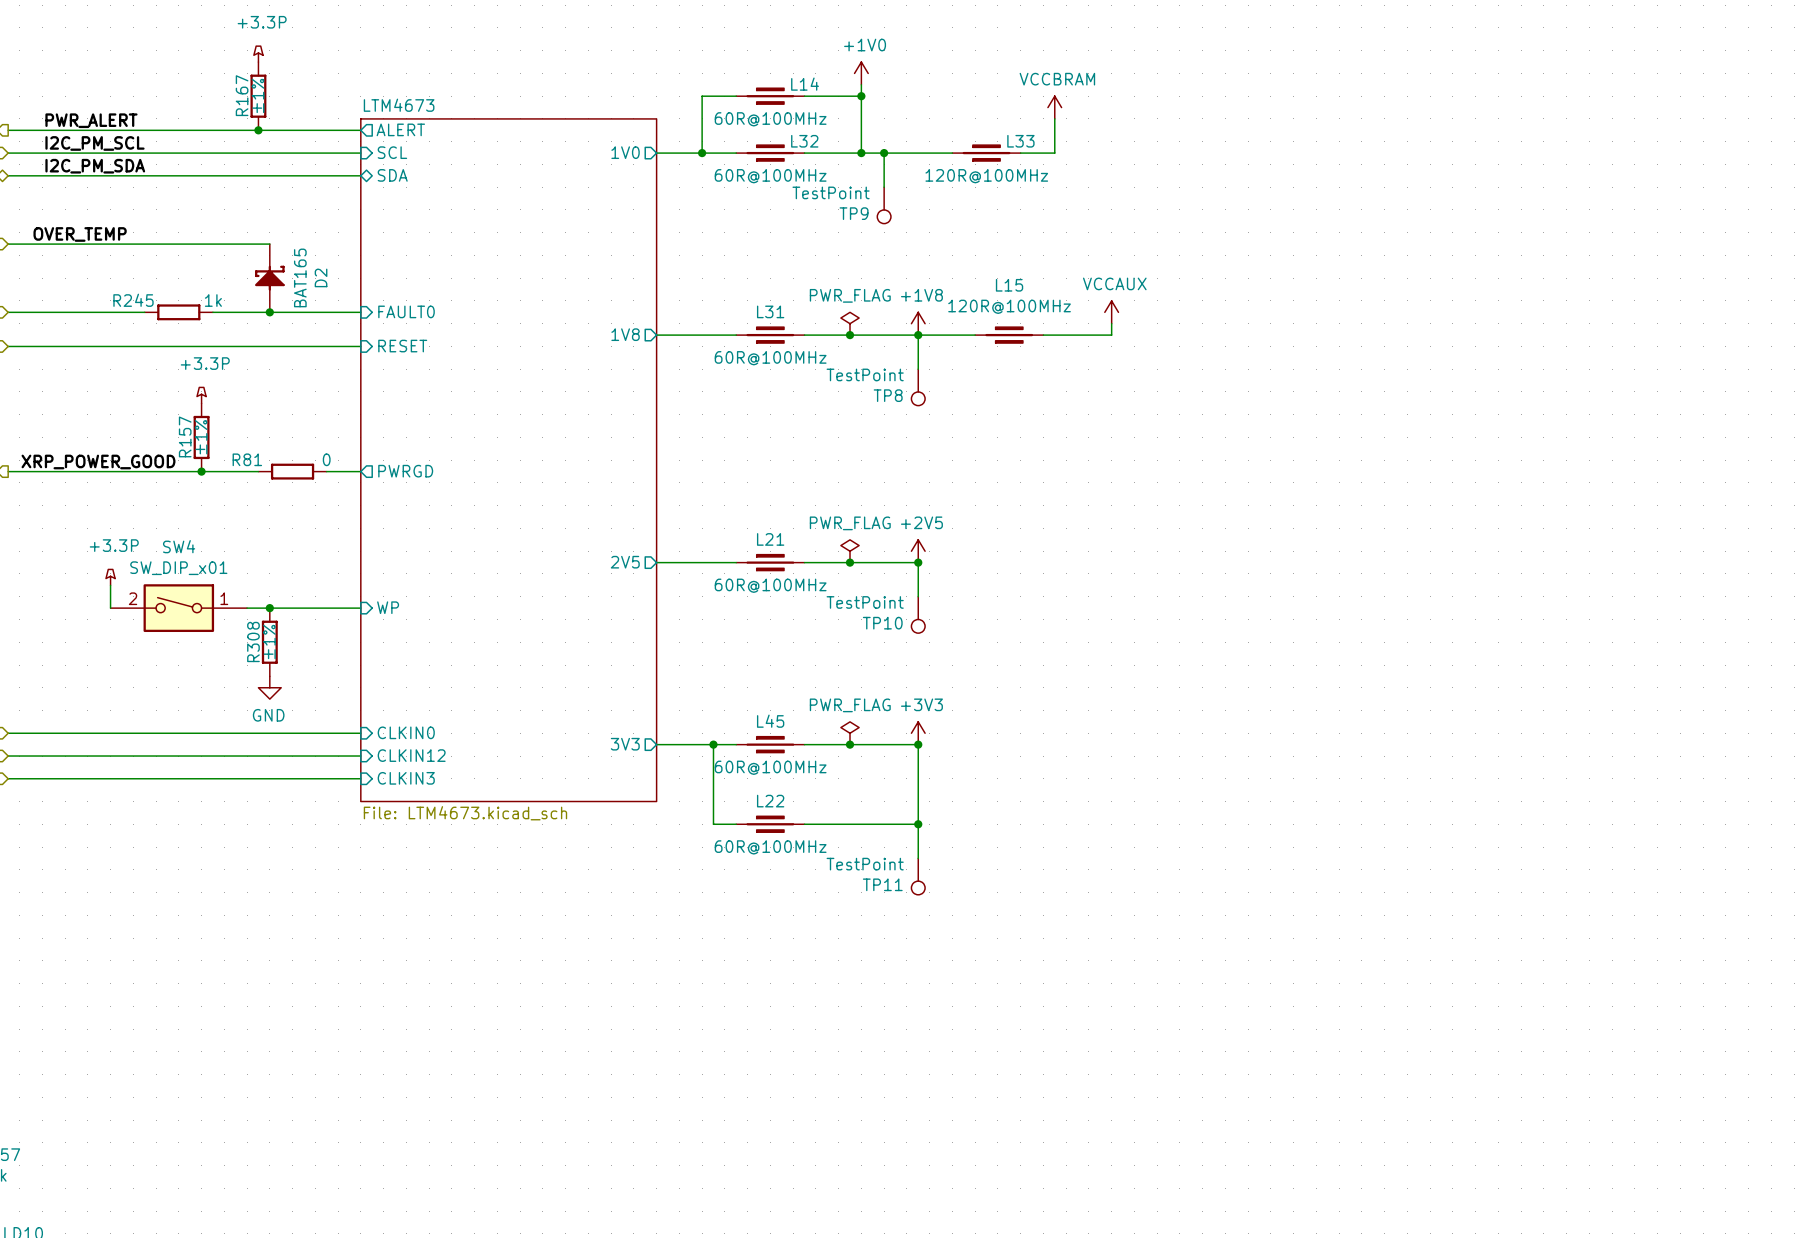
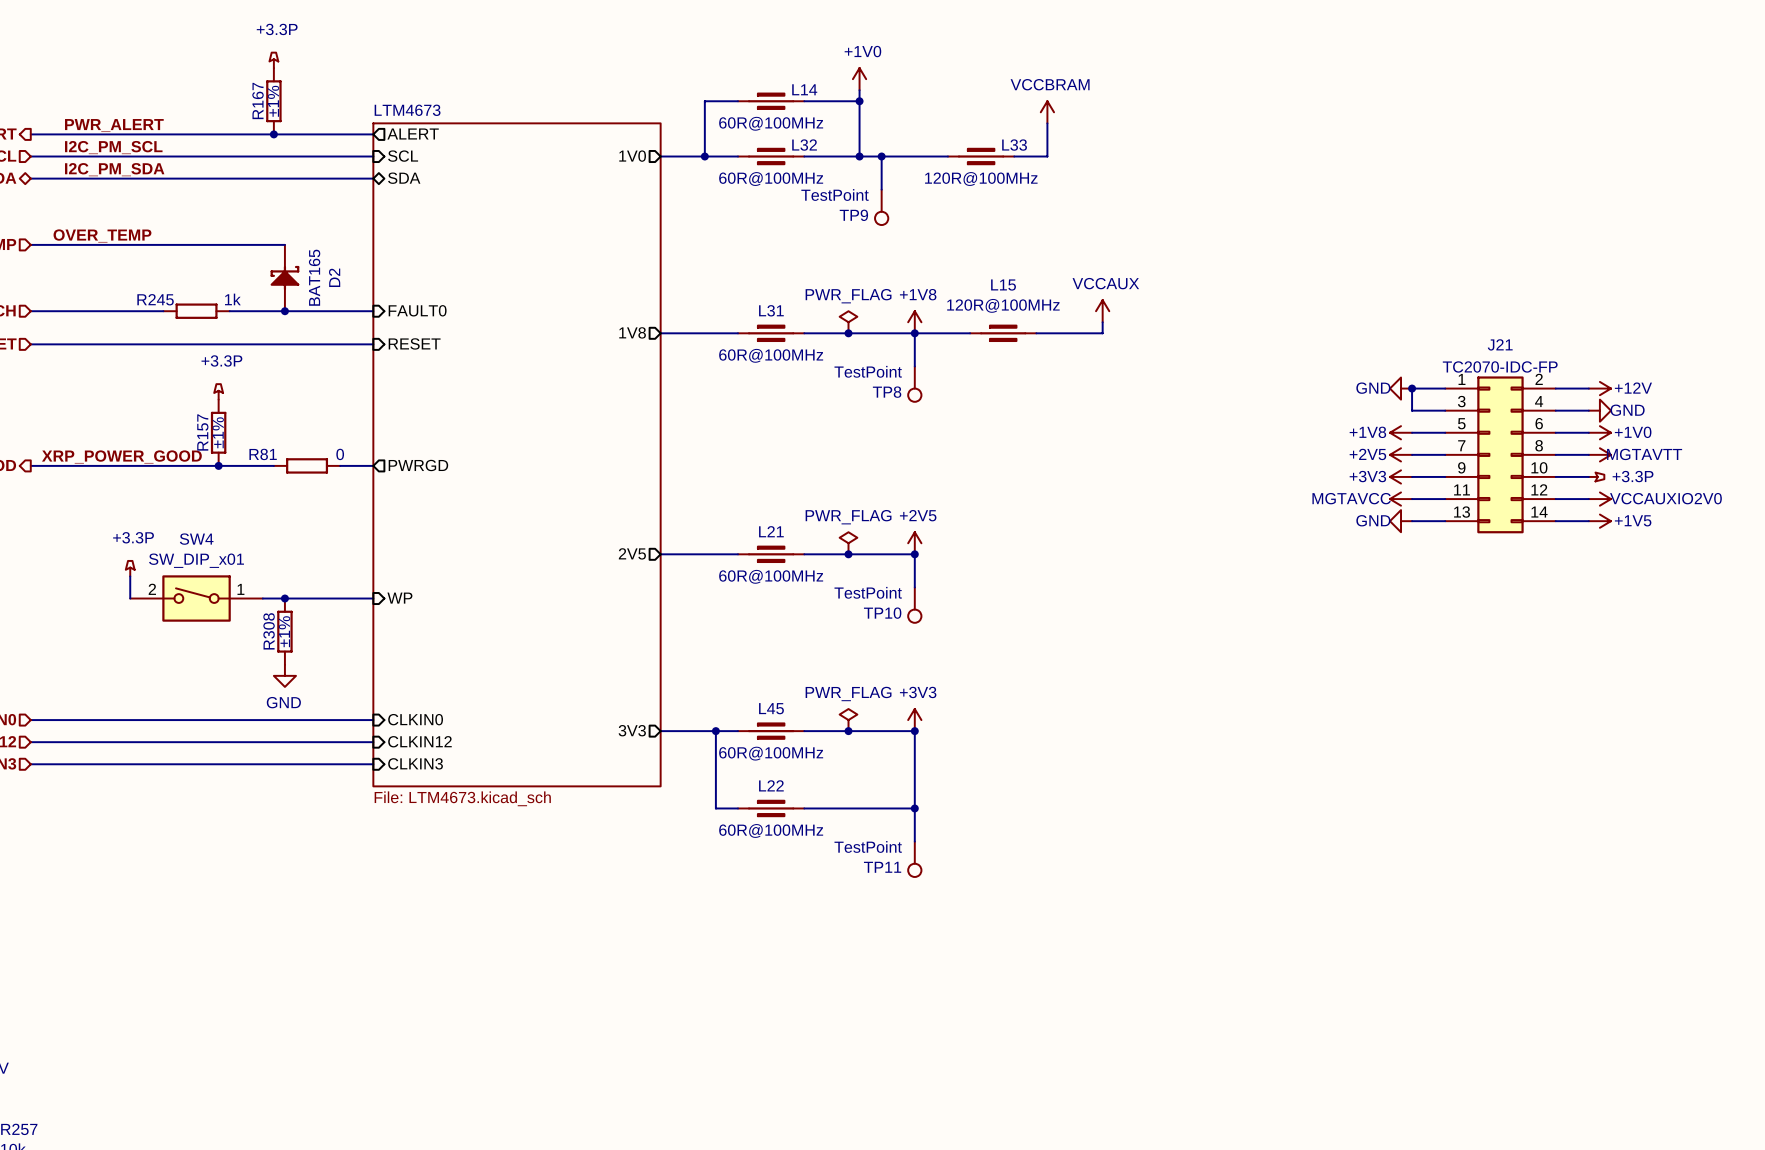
power symbol: none -> GND (1401, 388)
junction: none -> (1412, 388)
wire: none -> (1445, 388) (1412, 388) (1412, 410) (1445, 410)
wire: none -> (1555, 388) (1588, 388)
power symbol: none -> +12V (1599, 388)
wire: none -> (1555, 410) (1588, 410)
power symbol: none -> GND (1599, 410)
power symbol: none -> +1V8 (1401, 432)
wire: none -> (1412, 432) (1445, 432)
wire: none -> (1555, 432) (1588, 432)
power symbol: none -> +1V0 (1599, 432)
power symbol: none -> +2V5 (1401, 454)
wire: none -> (1412, 454) (1445, 454)
J21: none -> TC2070-IDC-FP (1500, 454)
wire: none -> (1555, 454) (1588, 454)
power symbol: none -> MGTAVTT (1599, 454)
power symbol: none -> +3V3 (1401, 476)
wire: none -> (1412, 476) (1445, 476)
wire: none -> (1555, 476) (1588, 476)
power symbol: none -> +3.3P (1596, 476)
power symbol: none -> MGTAVCC (1401, 499)
wire: none -> (1412, 499) (1445, 499)
wire: none -> (1555, 499) (1588, 499)
power symbol: none -> VCCAUXIO2V0 (1599, 499)
power symbol: none -> GND (1401, 521)
wire: none -> (1412, 521) (1445, 521)
wire: none -> (1555, 521) (1588, 521)
power symbol: none -> +1V5 (1599, 521)

